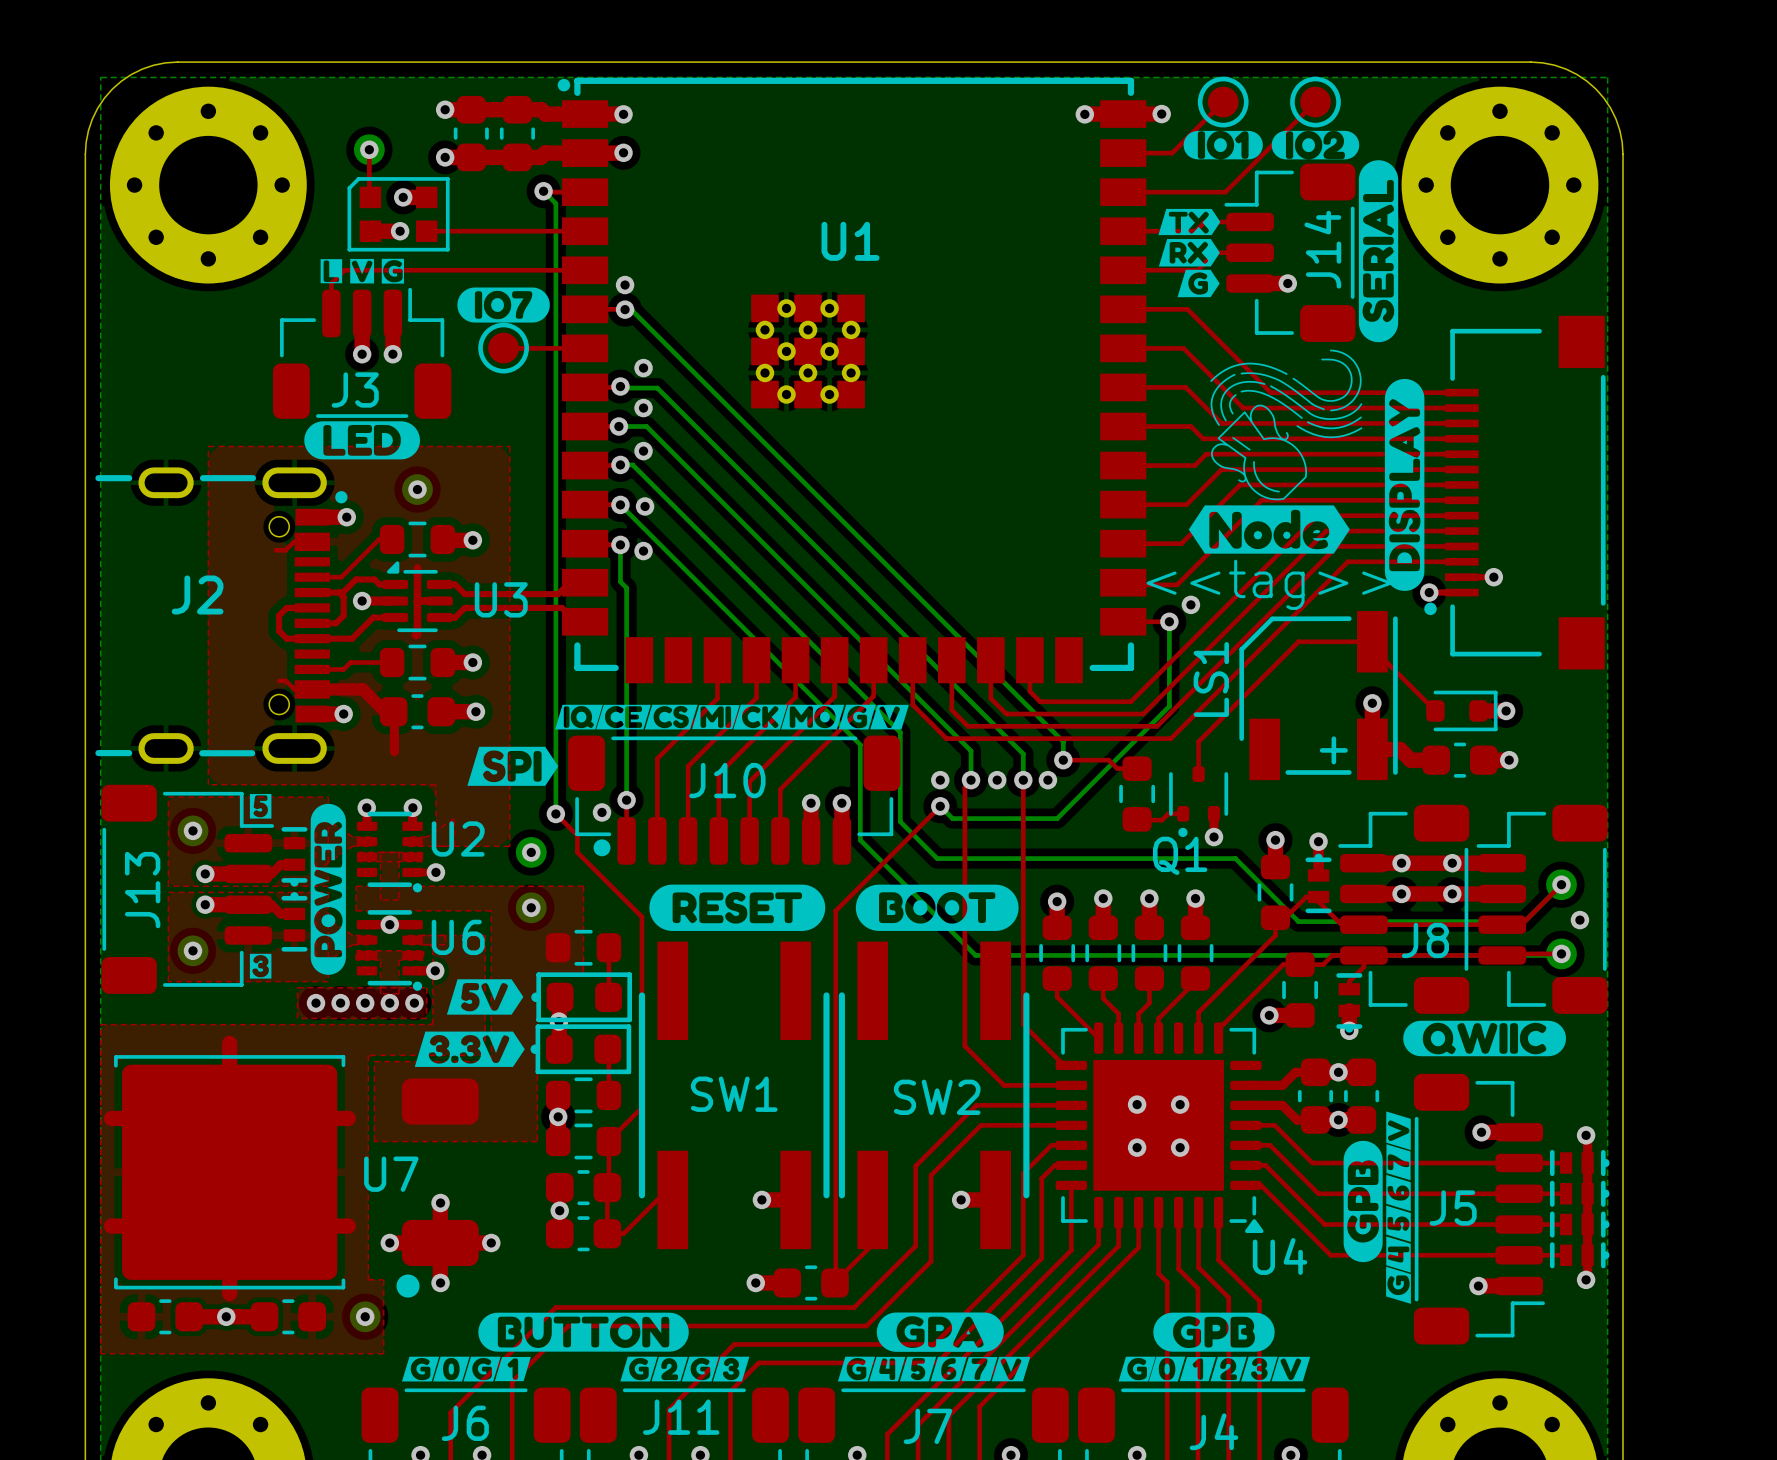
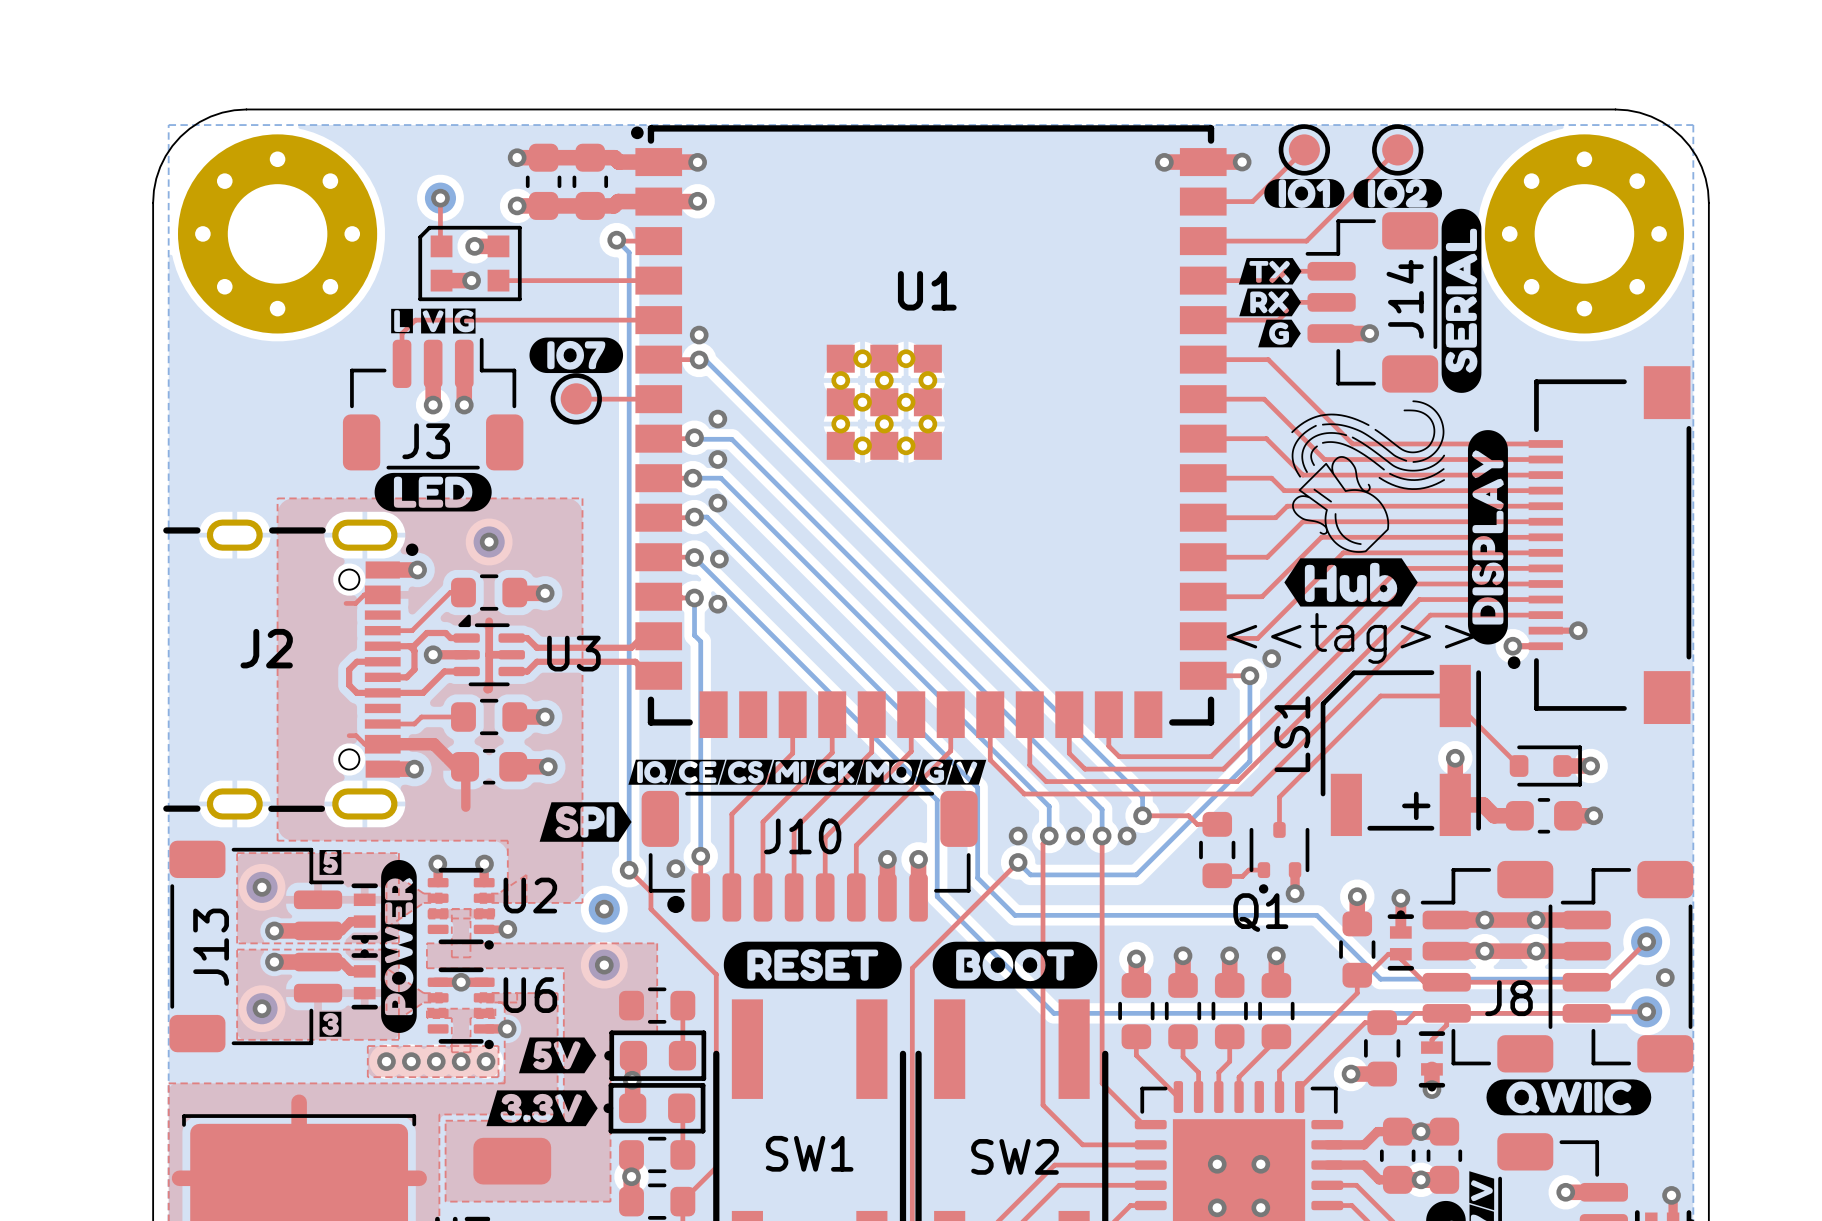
drawing shape: [1188, 505, 1350, 554] -> [1284, 558, 1418, 607]

